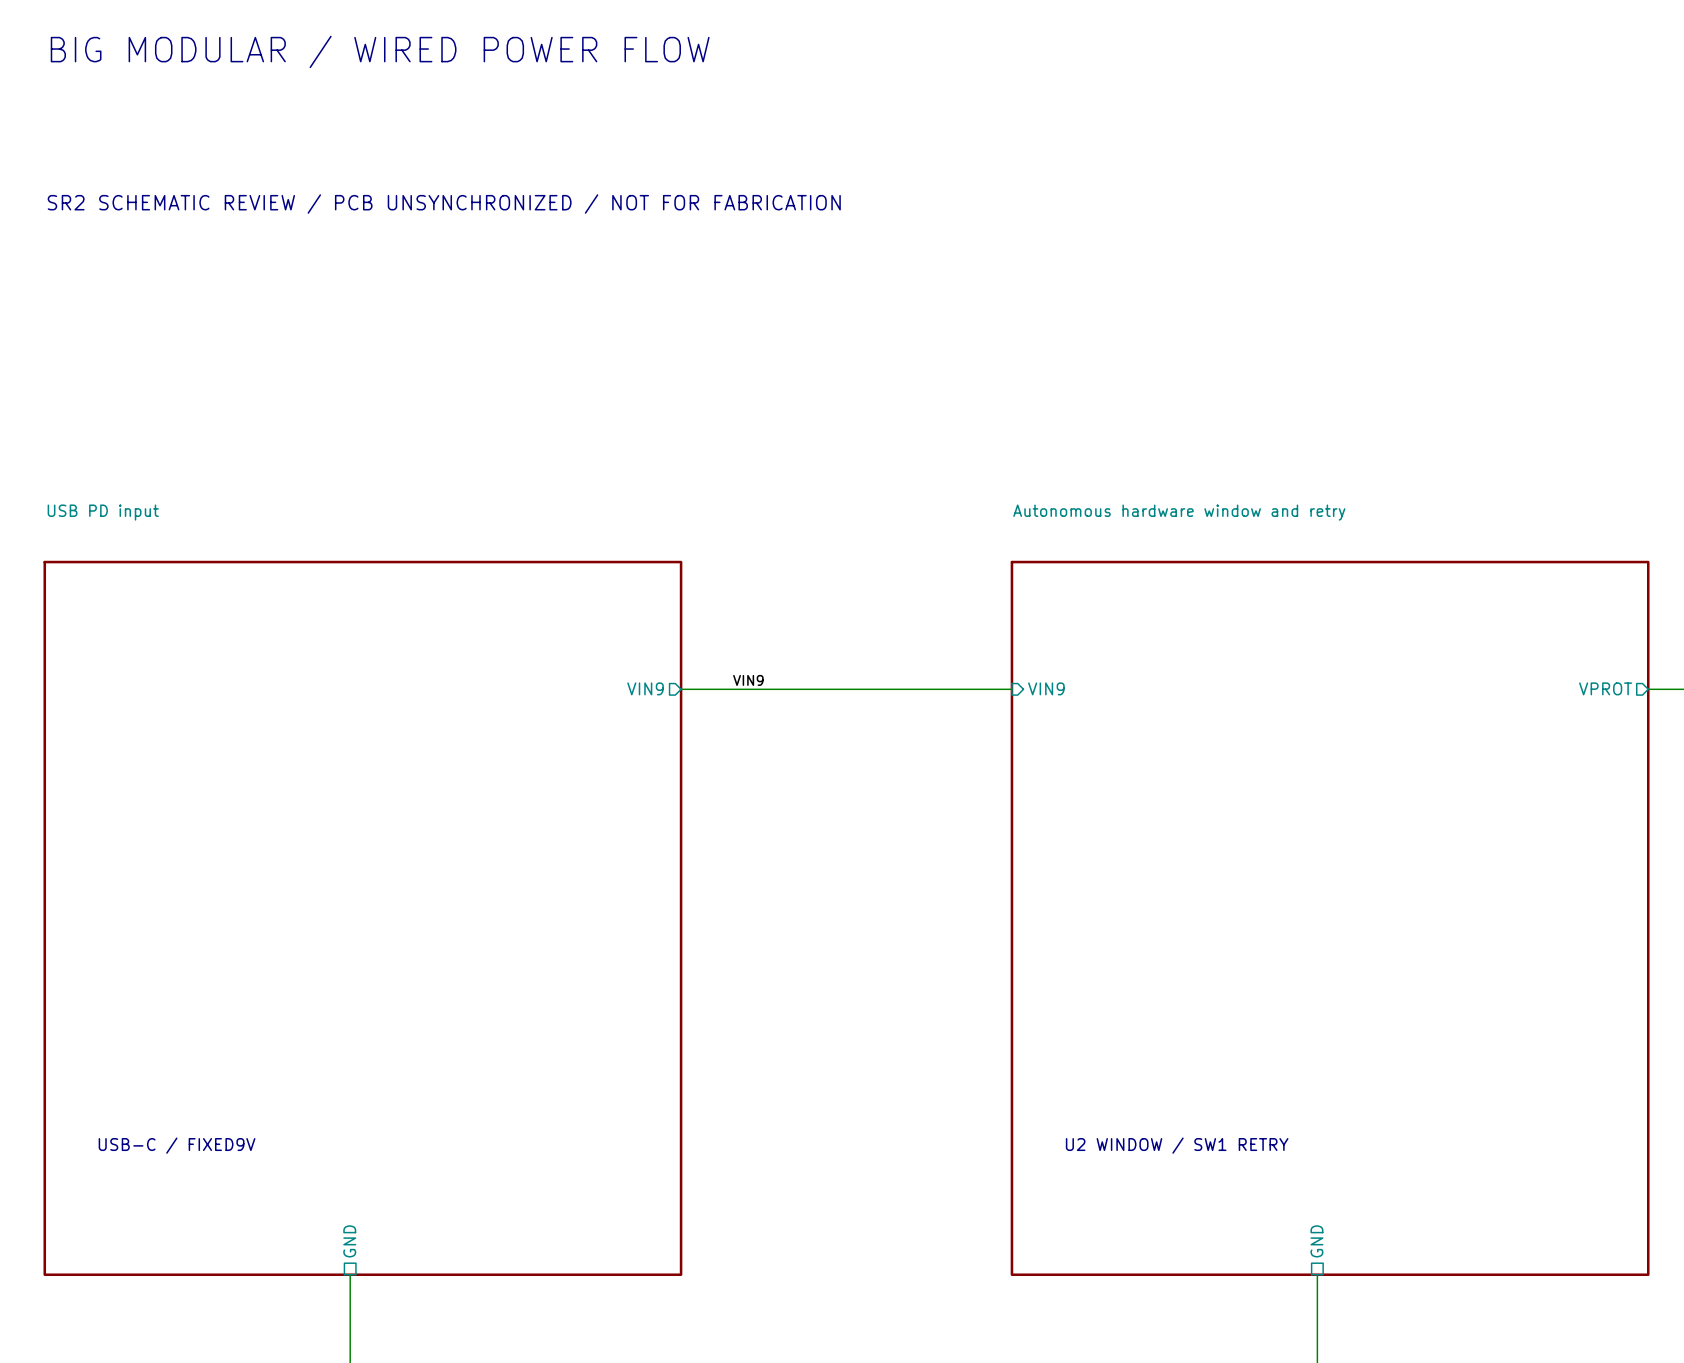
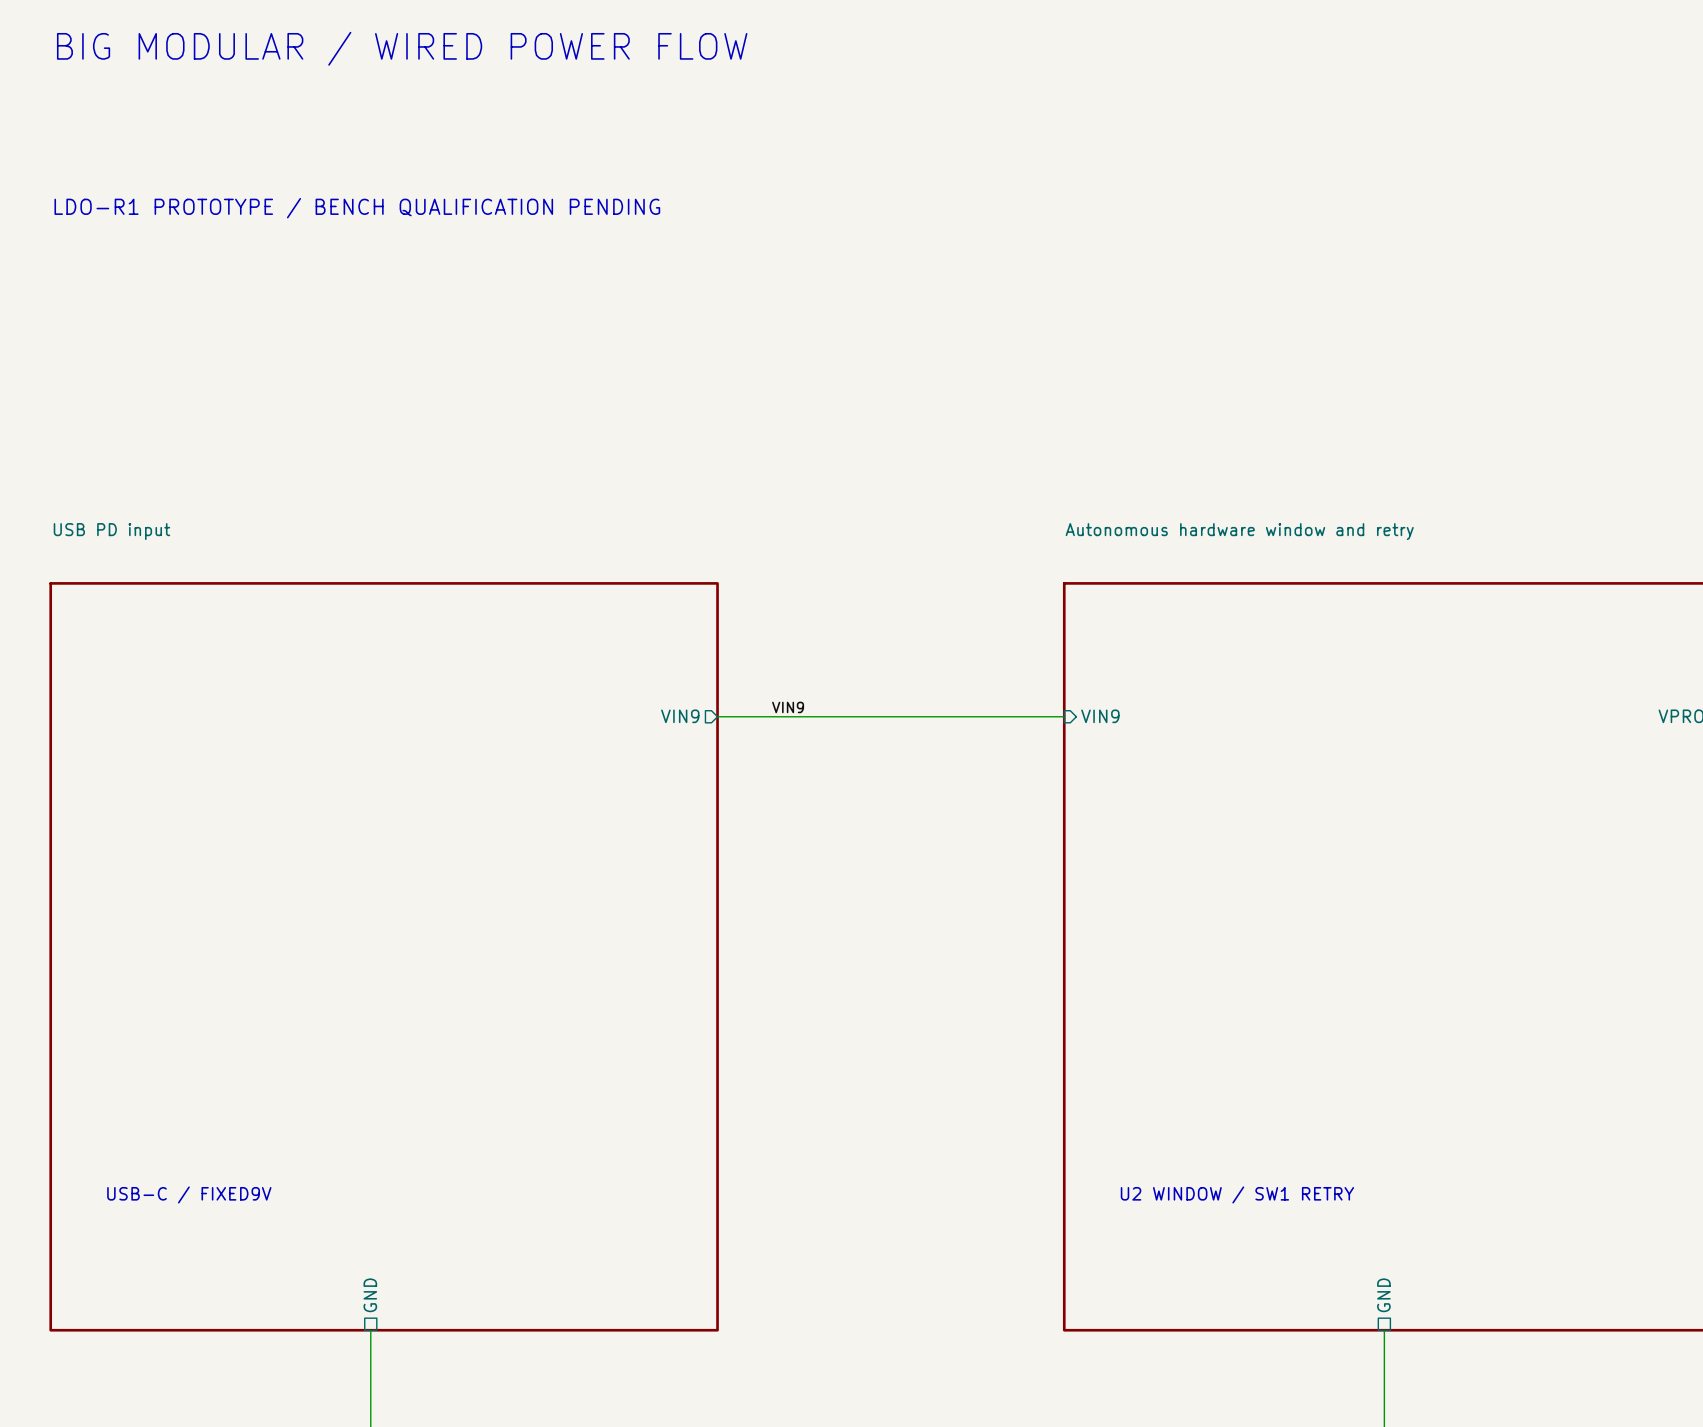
text: SR2 SCHEMATIC REVIEW / PCB UNSYNCHRONIZED / NOT FOR FABRICATION (444, 204) -> LDO-R1 PROTOTYPE / BENCH QUALIFICATION PENDING (357, 208)

